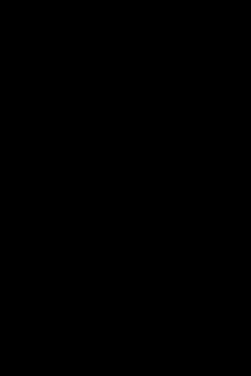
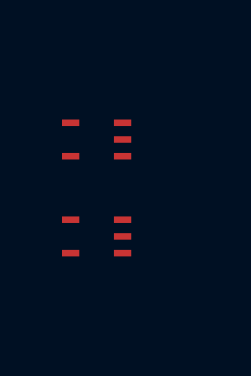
part: none -> (96, 139)
part: none -> (96, 236)

